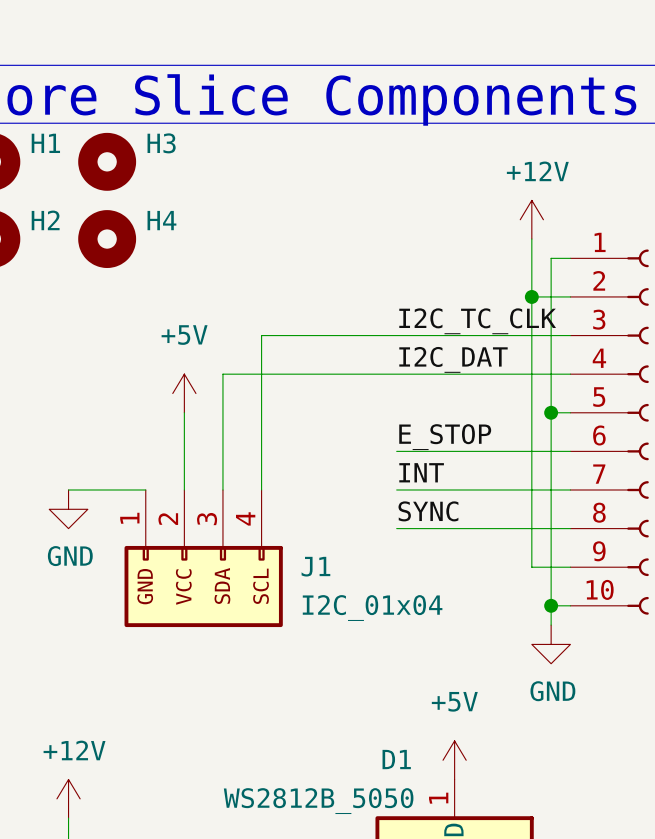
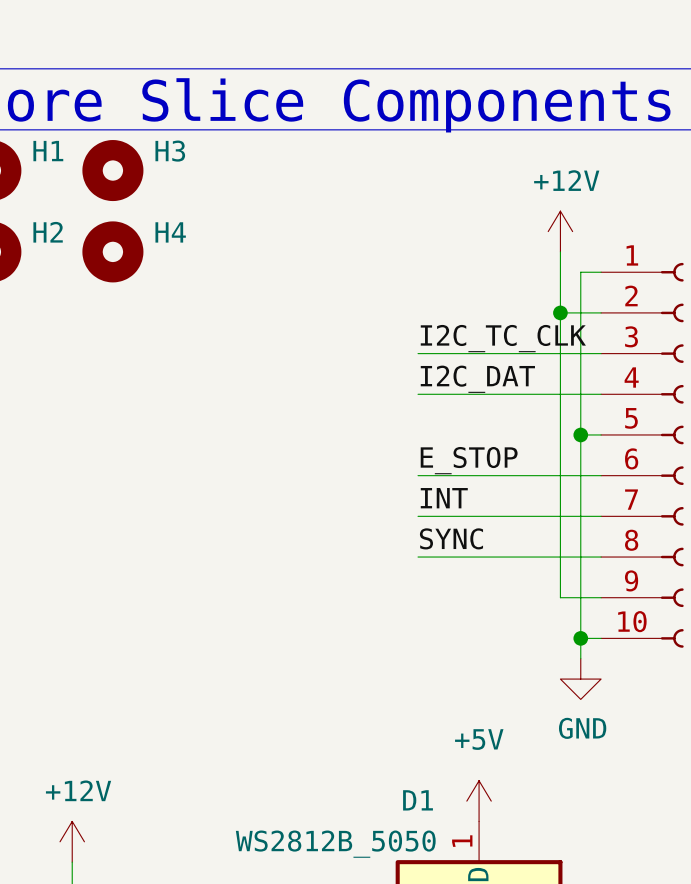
wire: (396, 335) (261, 335) (261, 489) -> none
wire: (396, 374) (222, 374) (222, 489) -> none
power symbol: +5V (184, 393) -> none
wire: (184, 412) (184, 489) -> none
wire: (68, 489) (145, 489) -> none
power symbol: GND (68, 509) -> none
J1: I2C_01x04 (203, 558) -> none

